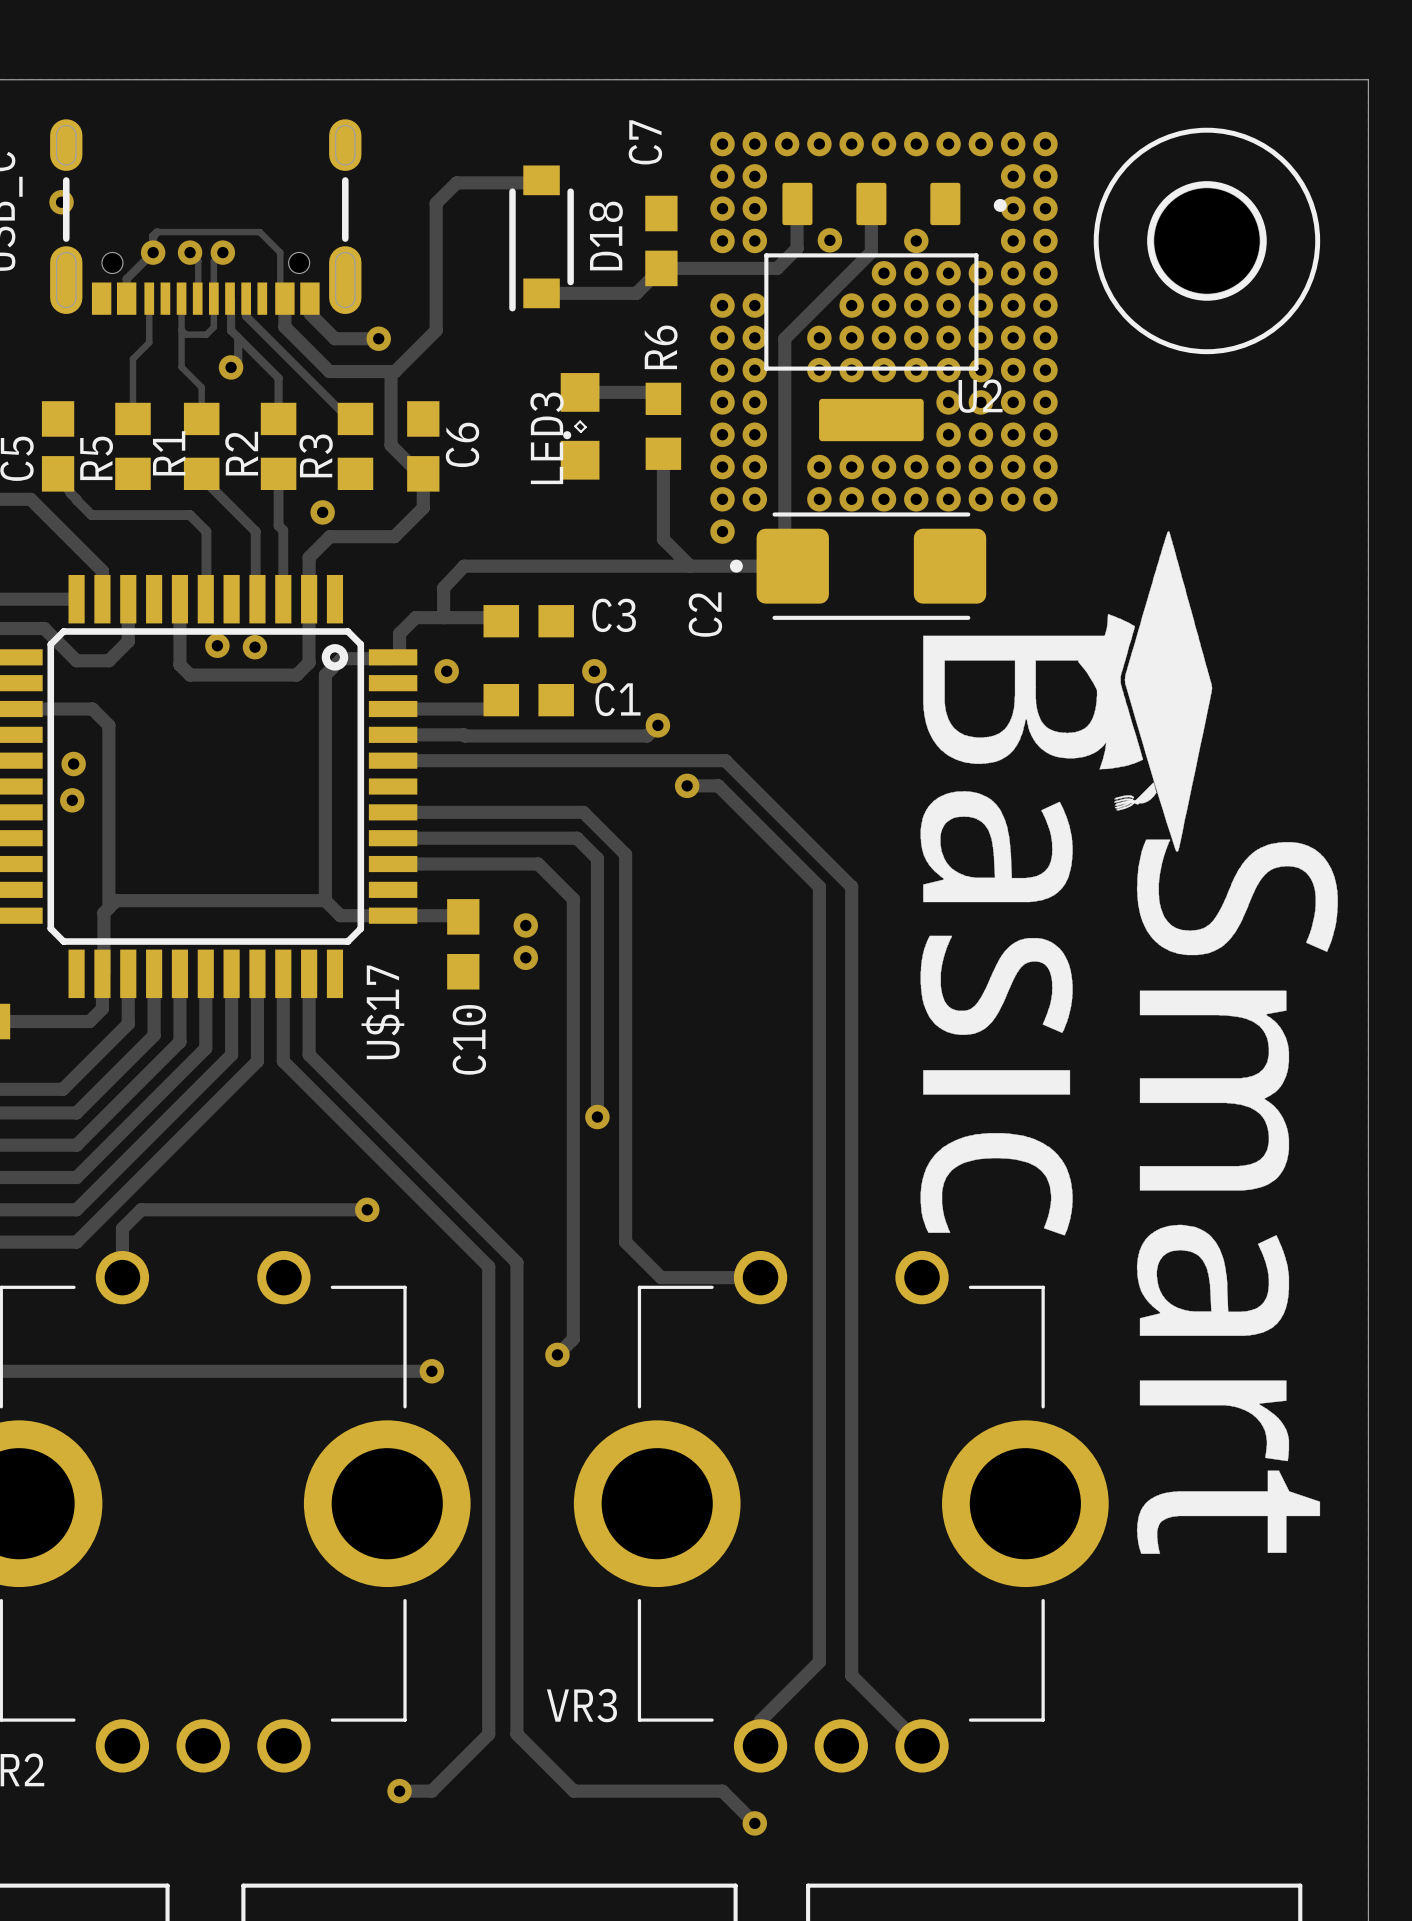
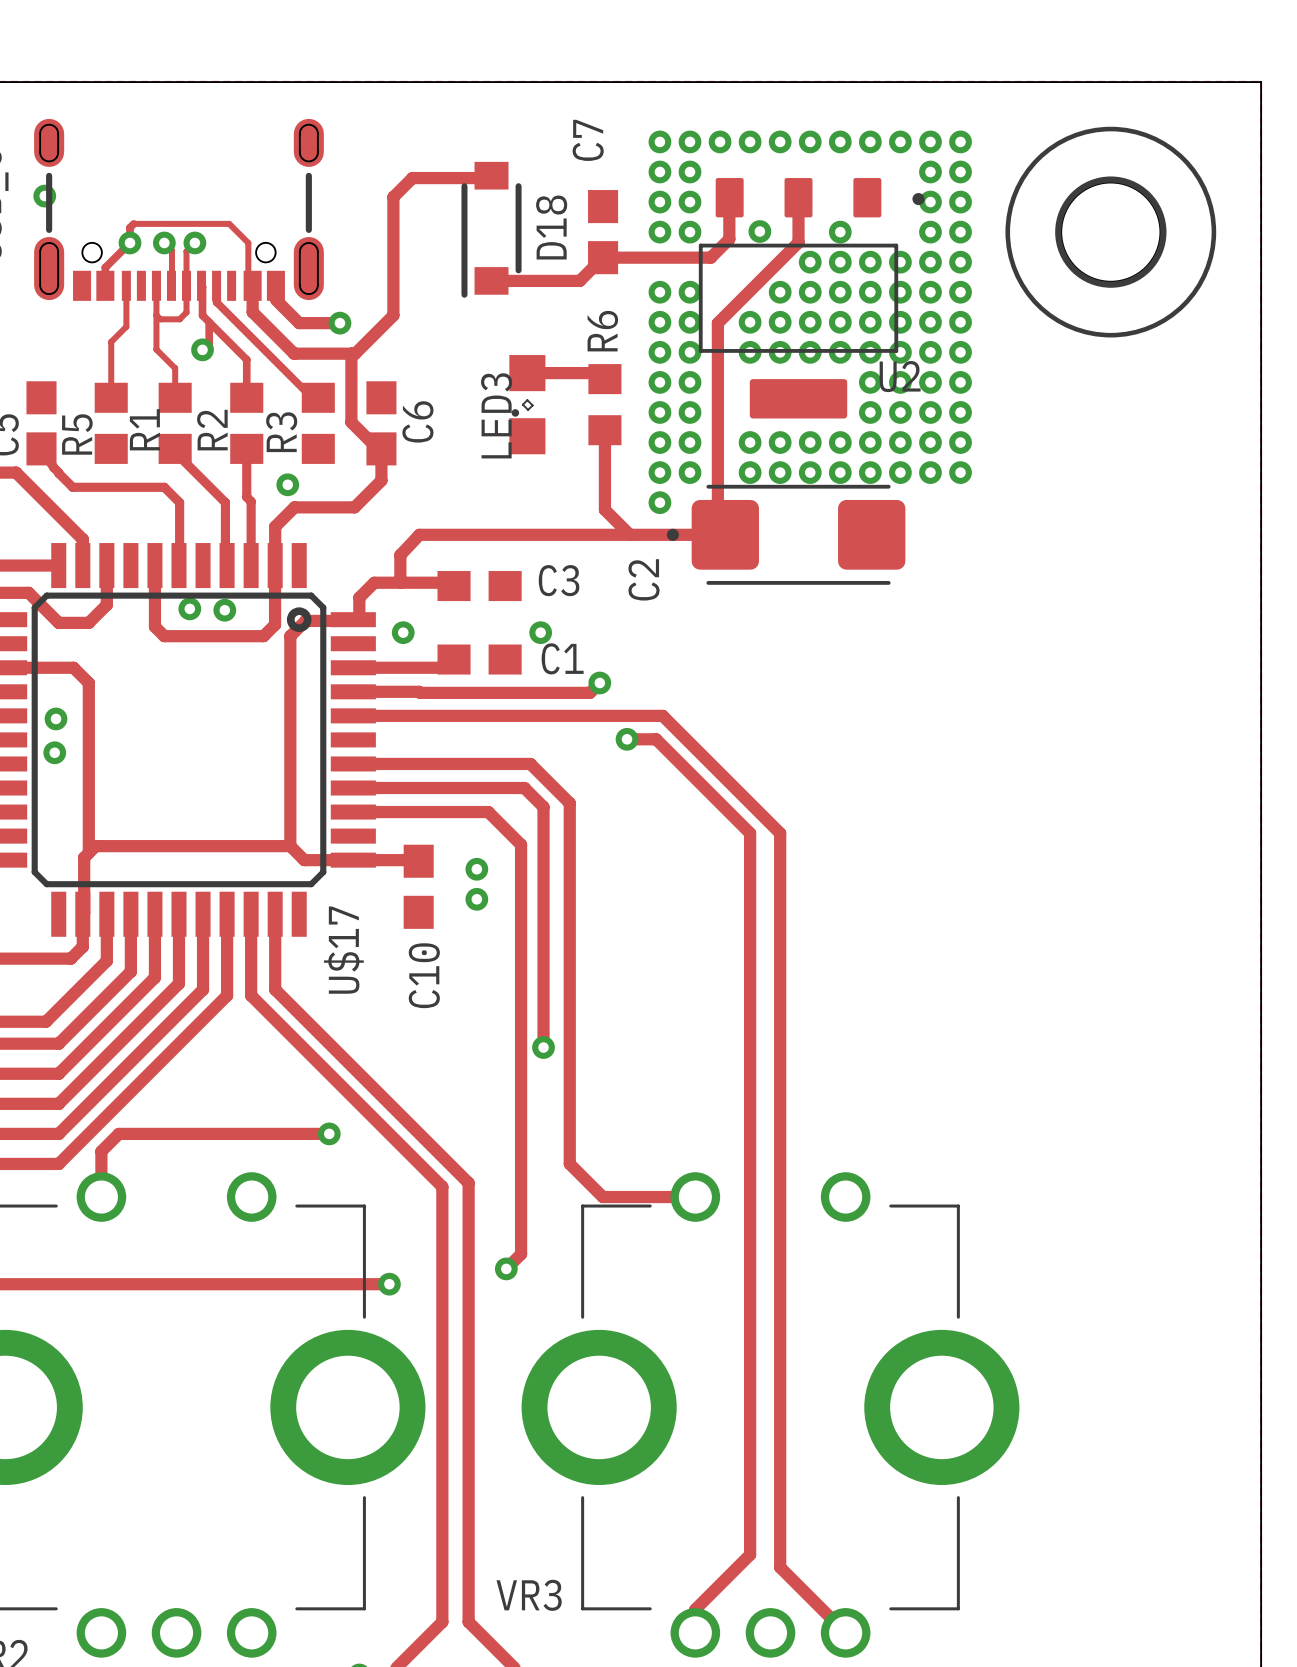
drawing: [920, 531, 1338, 1554] -> none

